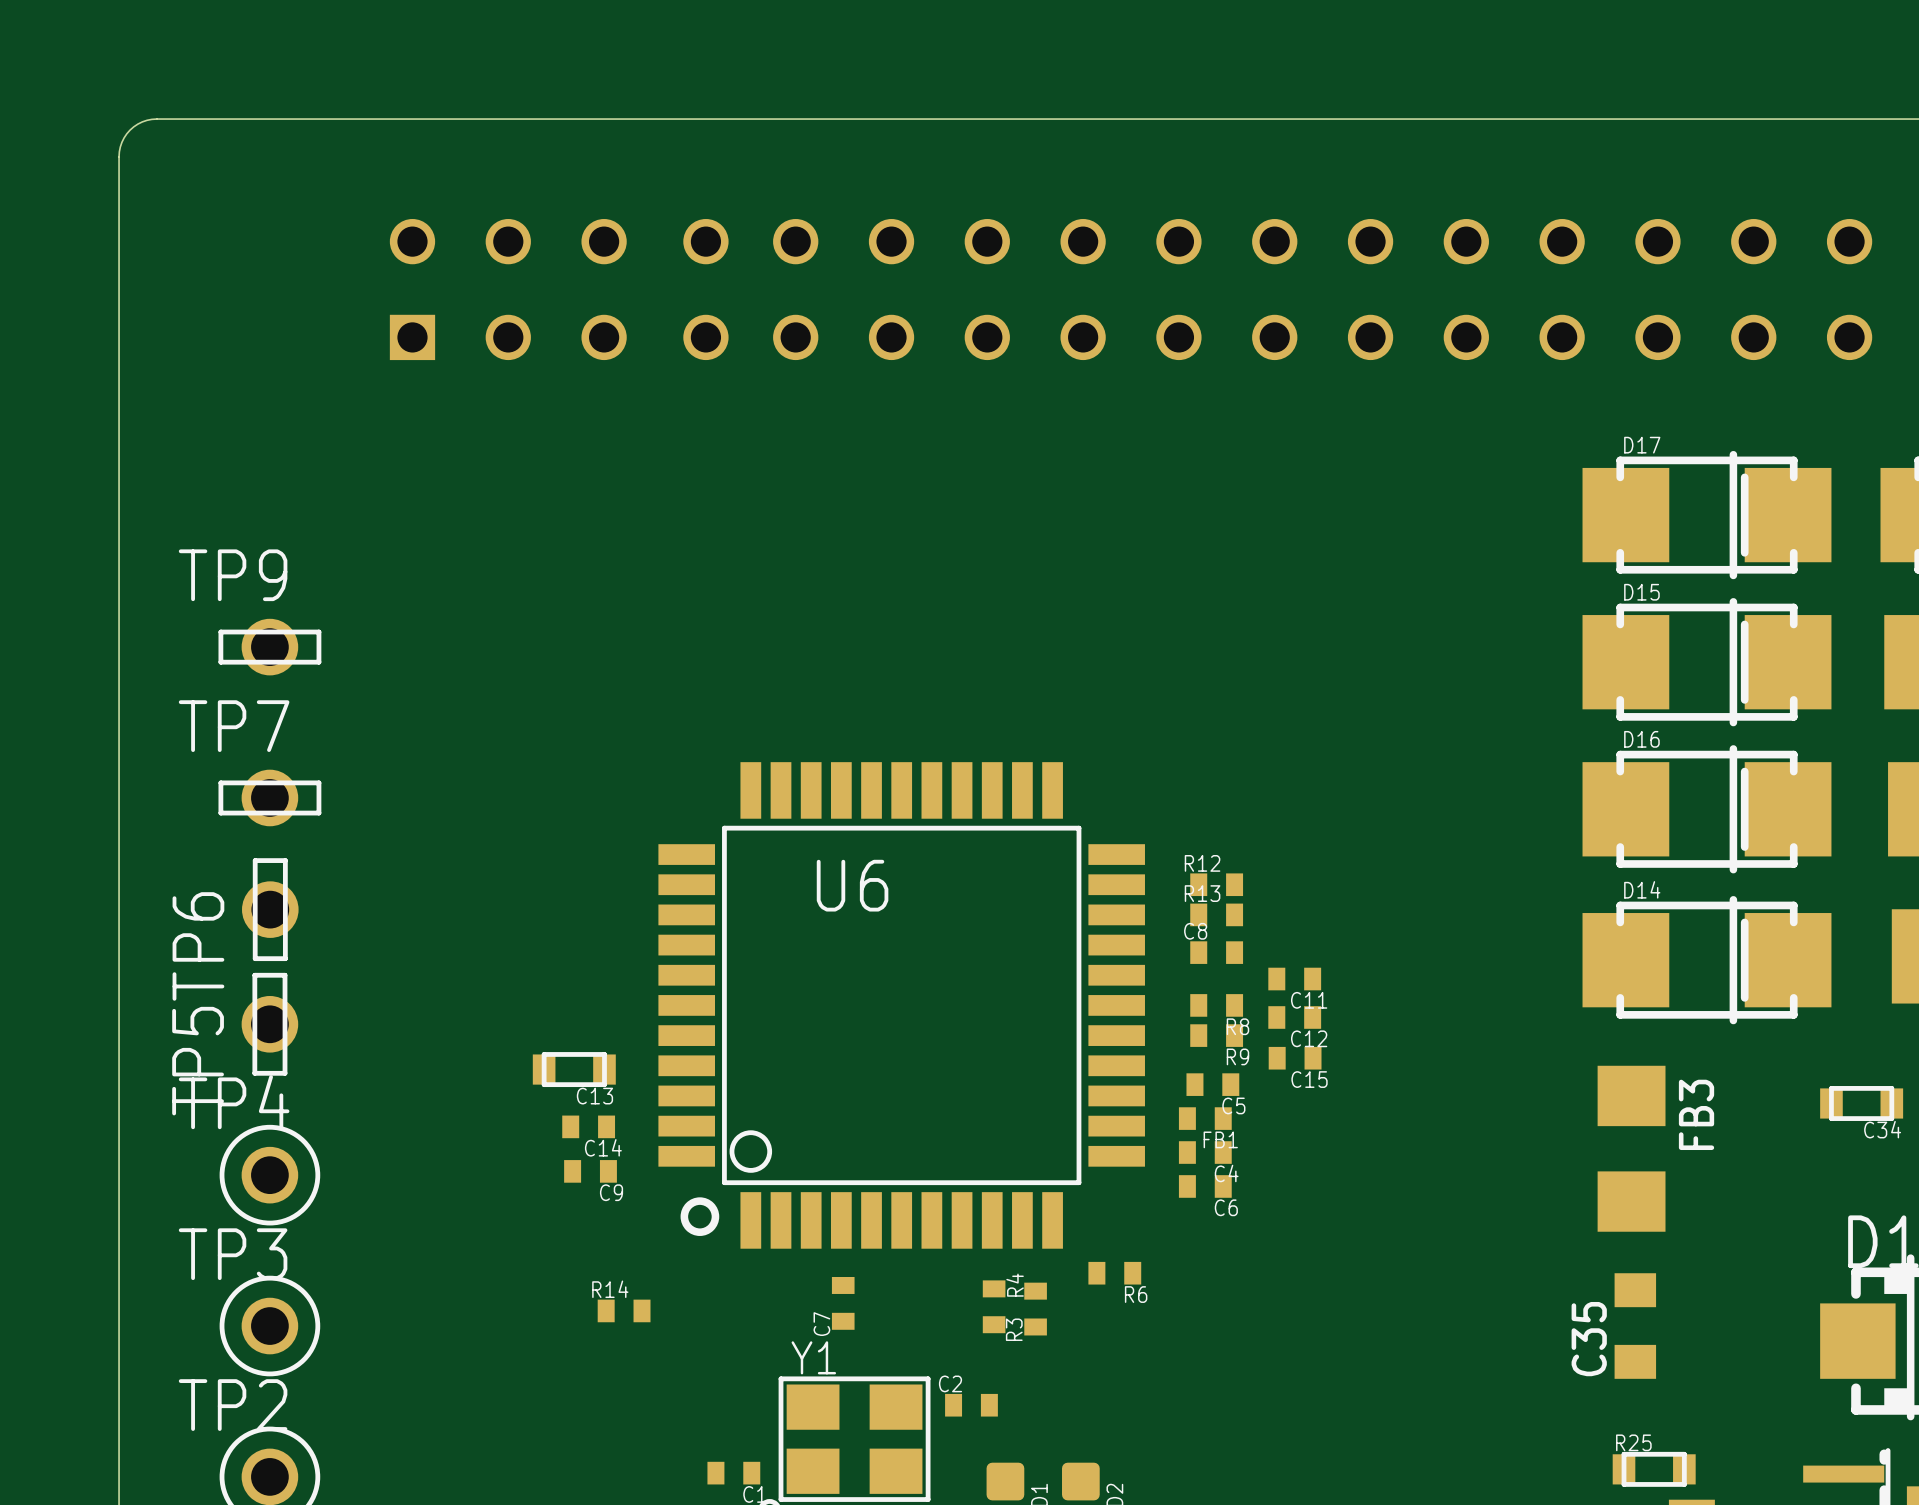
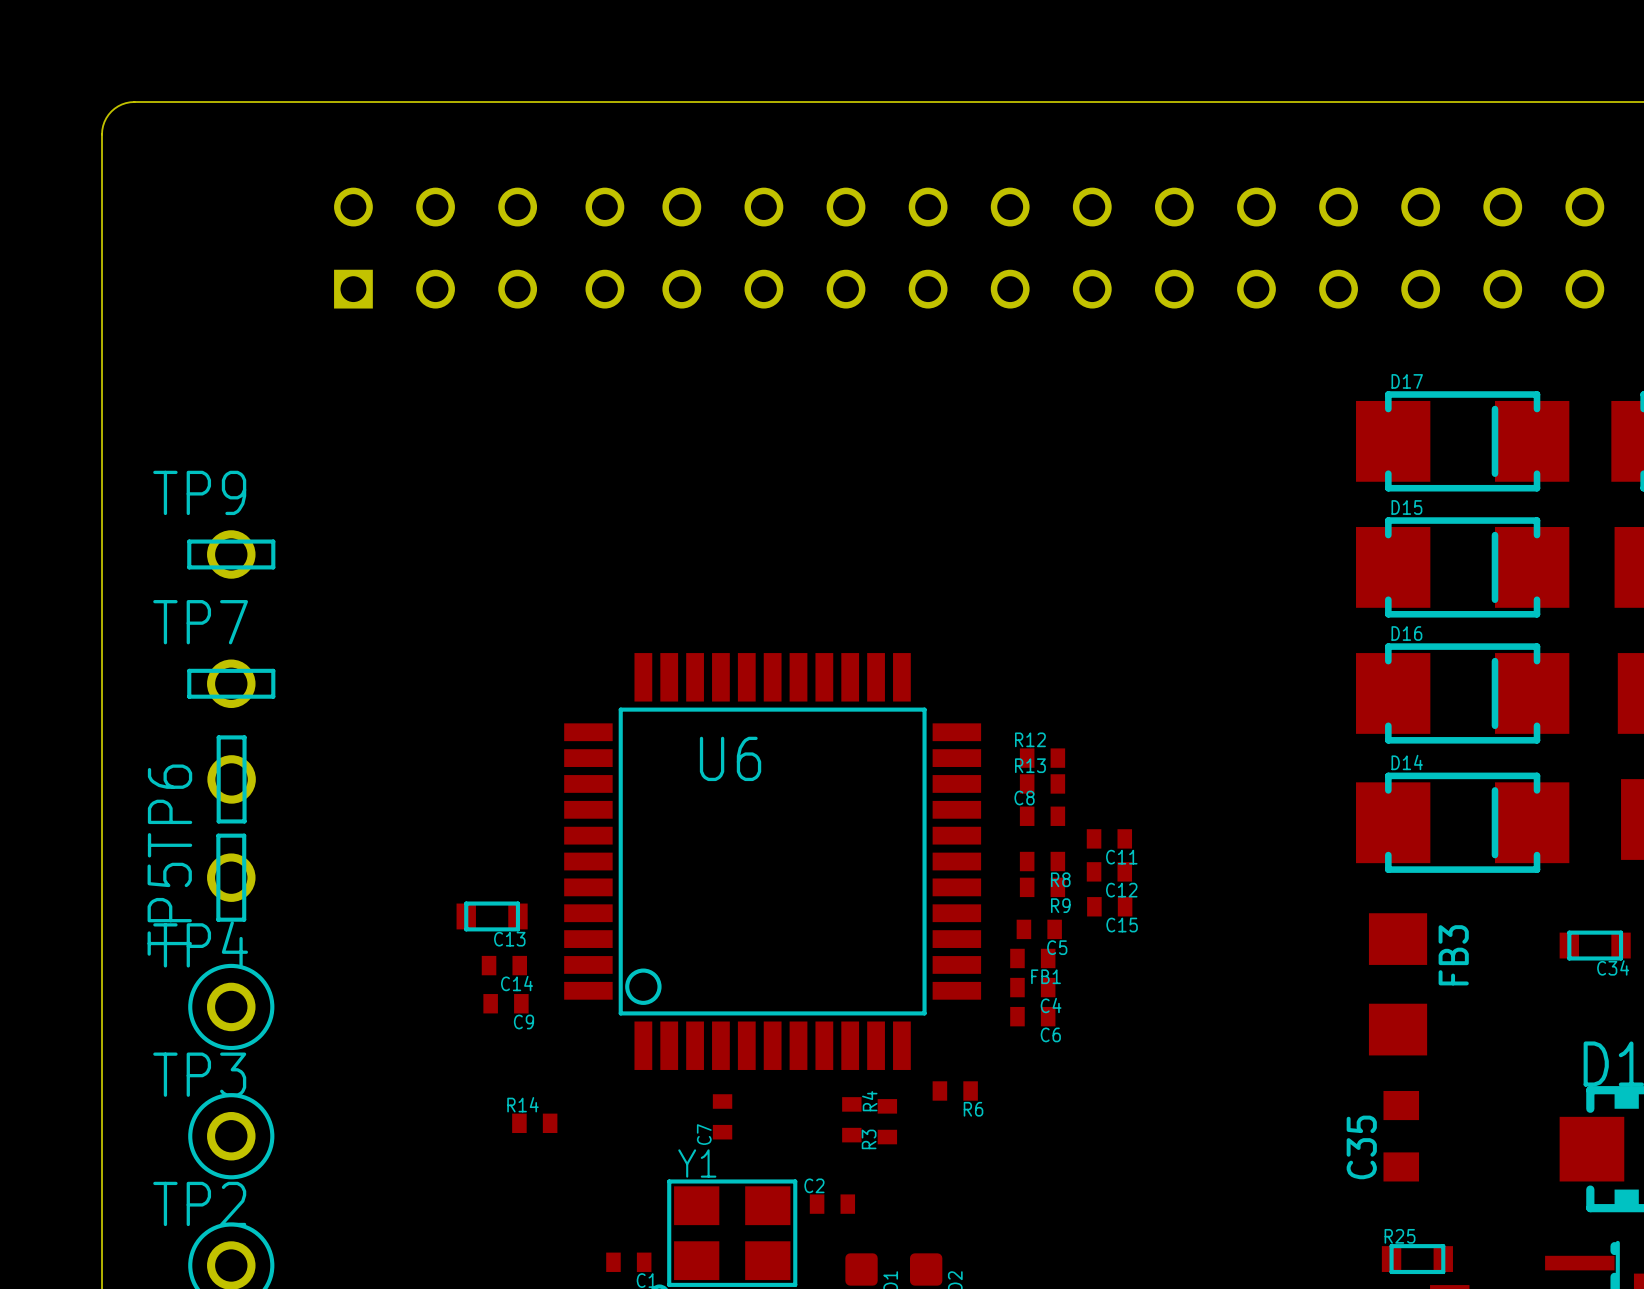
line: (1733, 454) (1733, 575) -> none
line: (1733, 601) (1733, 722) -> none
line: (1733, 748) (1733, 869) -> none
line: (1733, 899) (1733, 1020) -> none
drawing: [680, 1197, 720, 1236] -> none
line: (1910, 1258) (1910, 1416) -> none

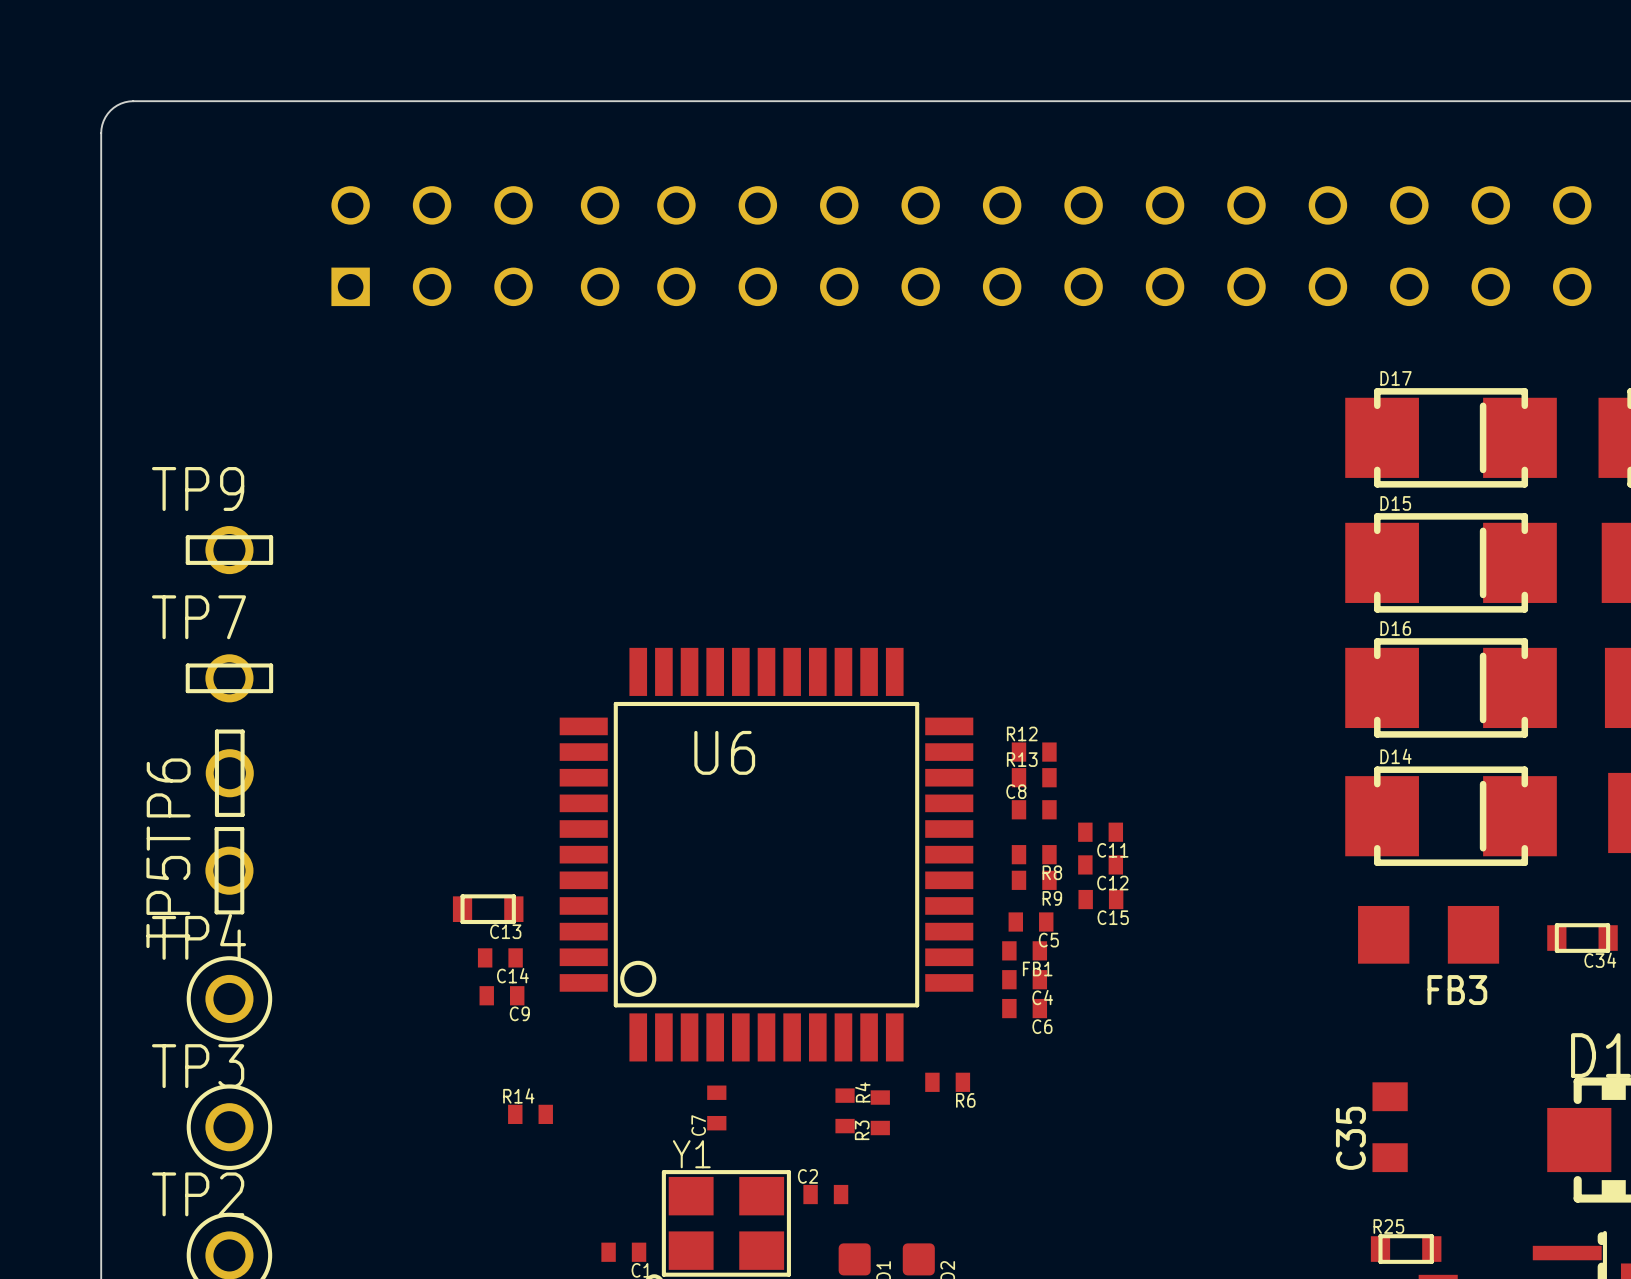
FB3 rotation: 0° (1398, 984) -> 90° clockwise (1428, 934)

